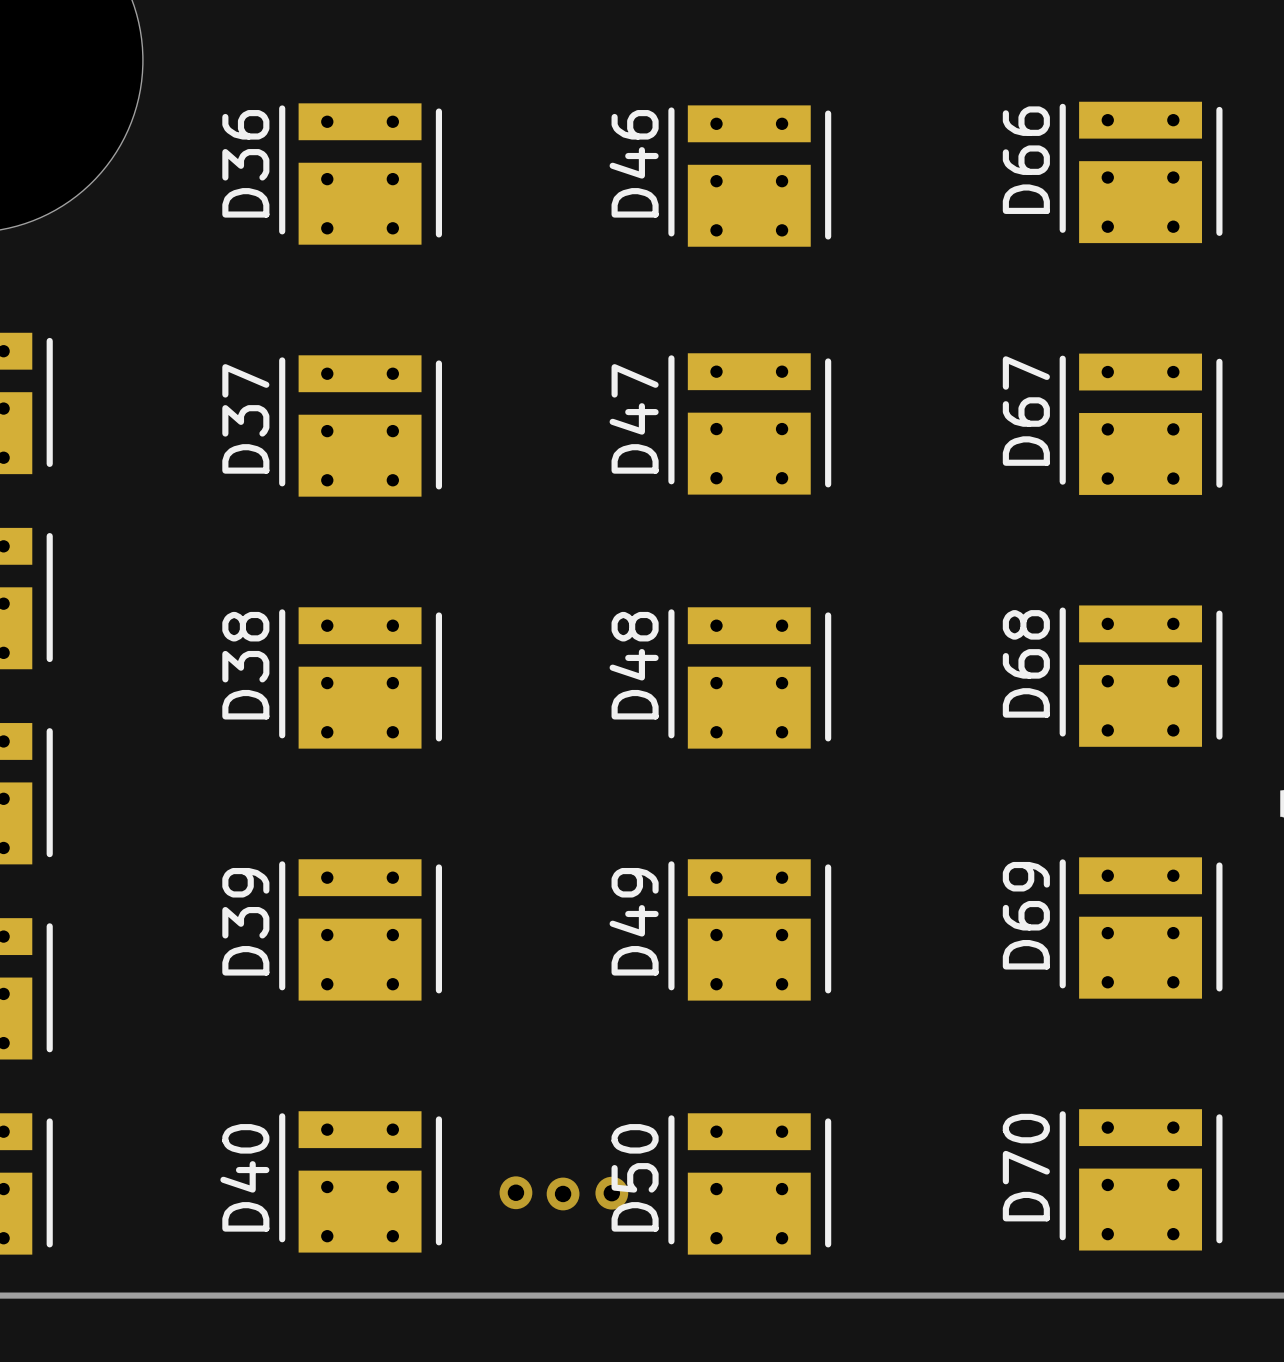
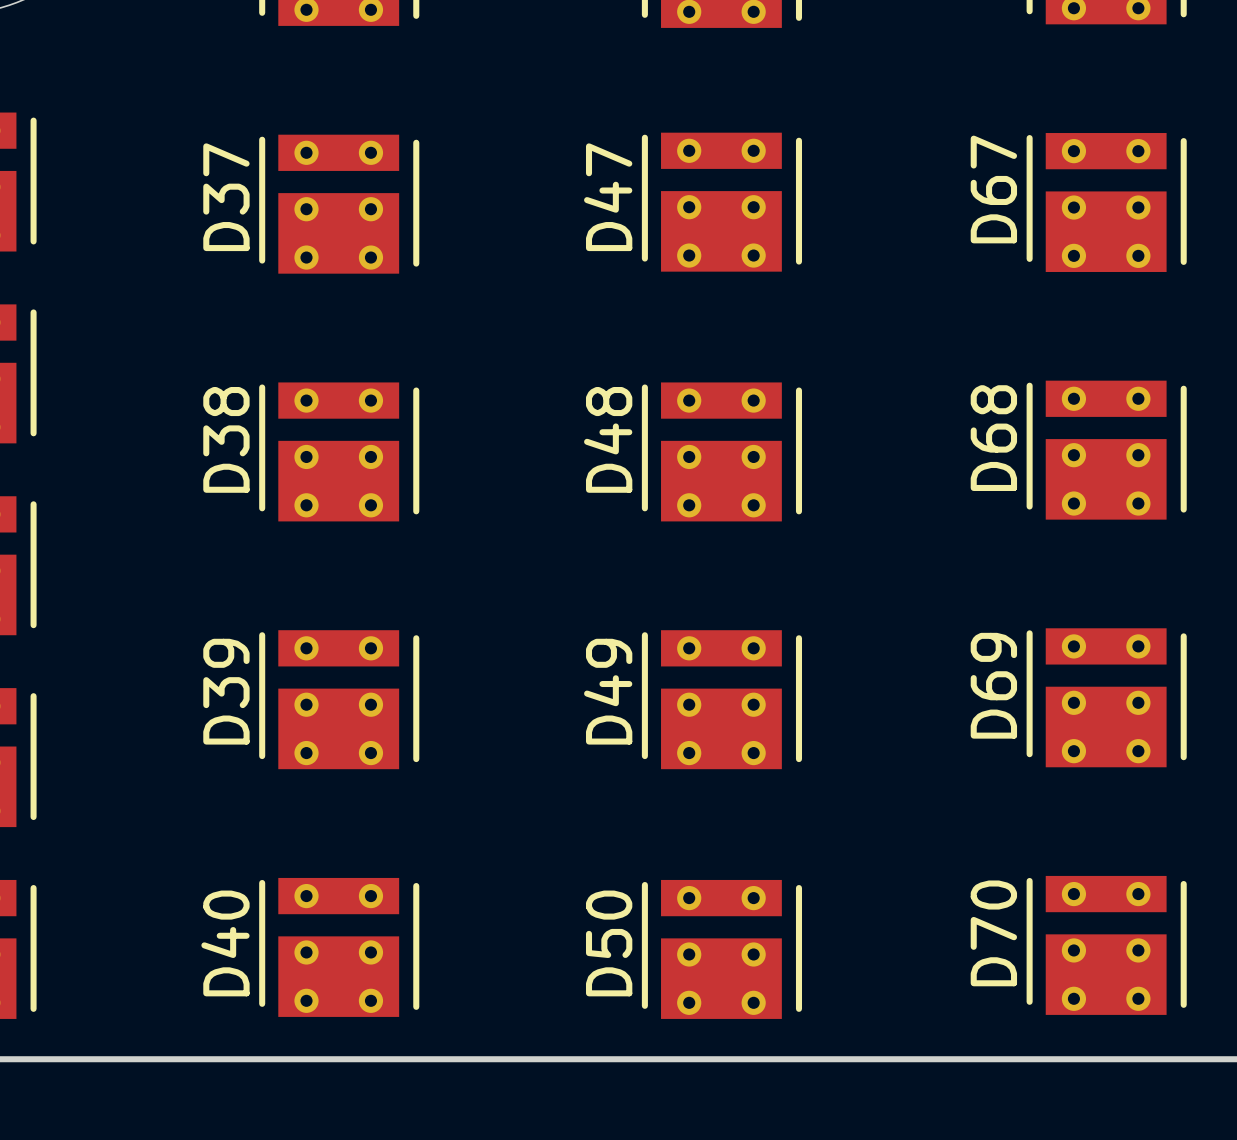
via: (515, 1192) -> none
via: (563, 1193) -> none
via: (611, 1193) -> none

